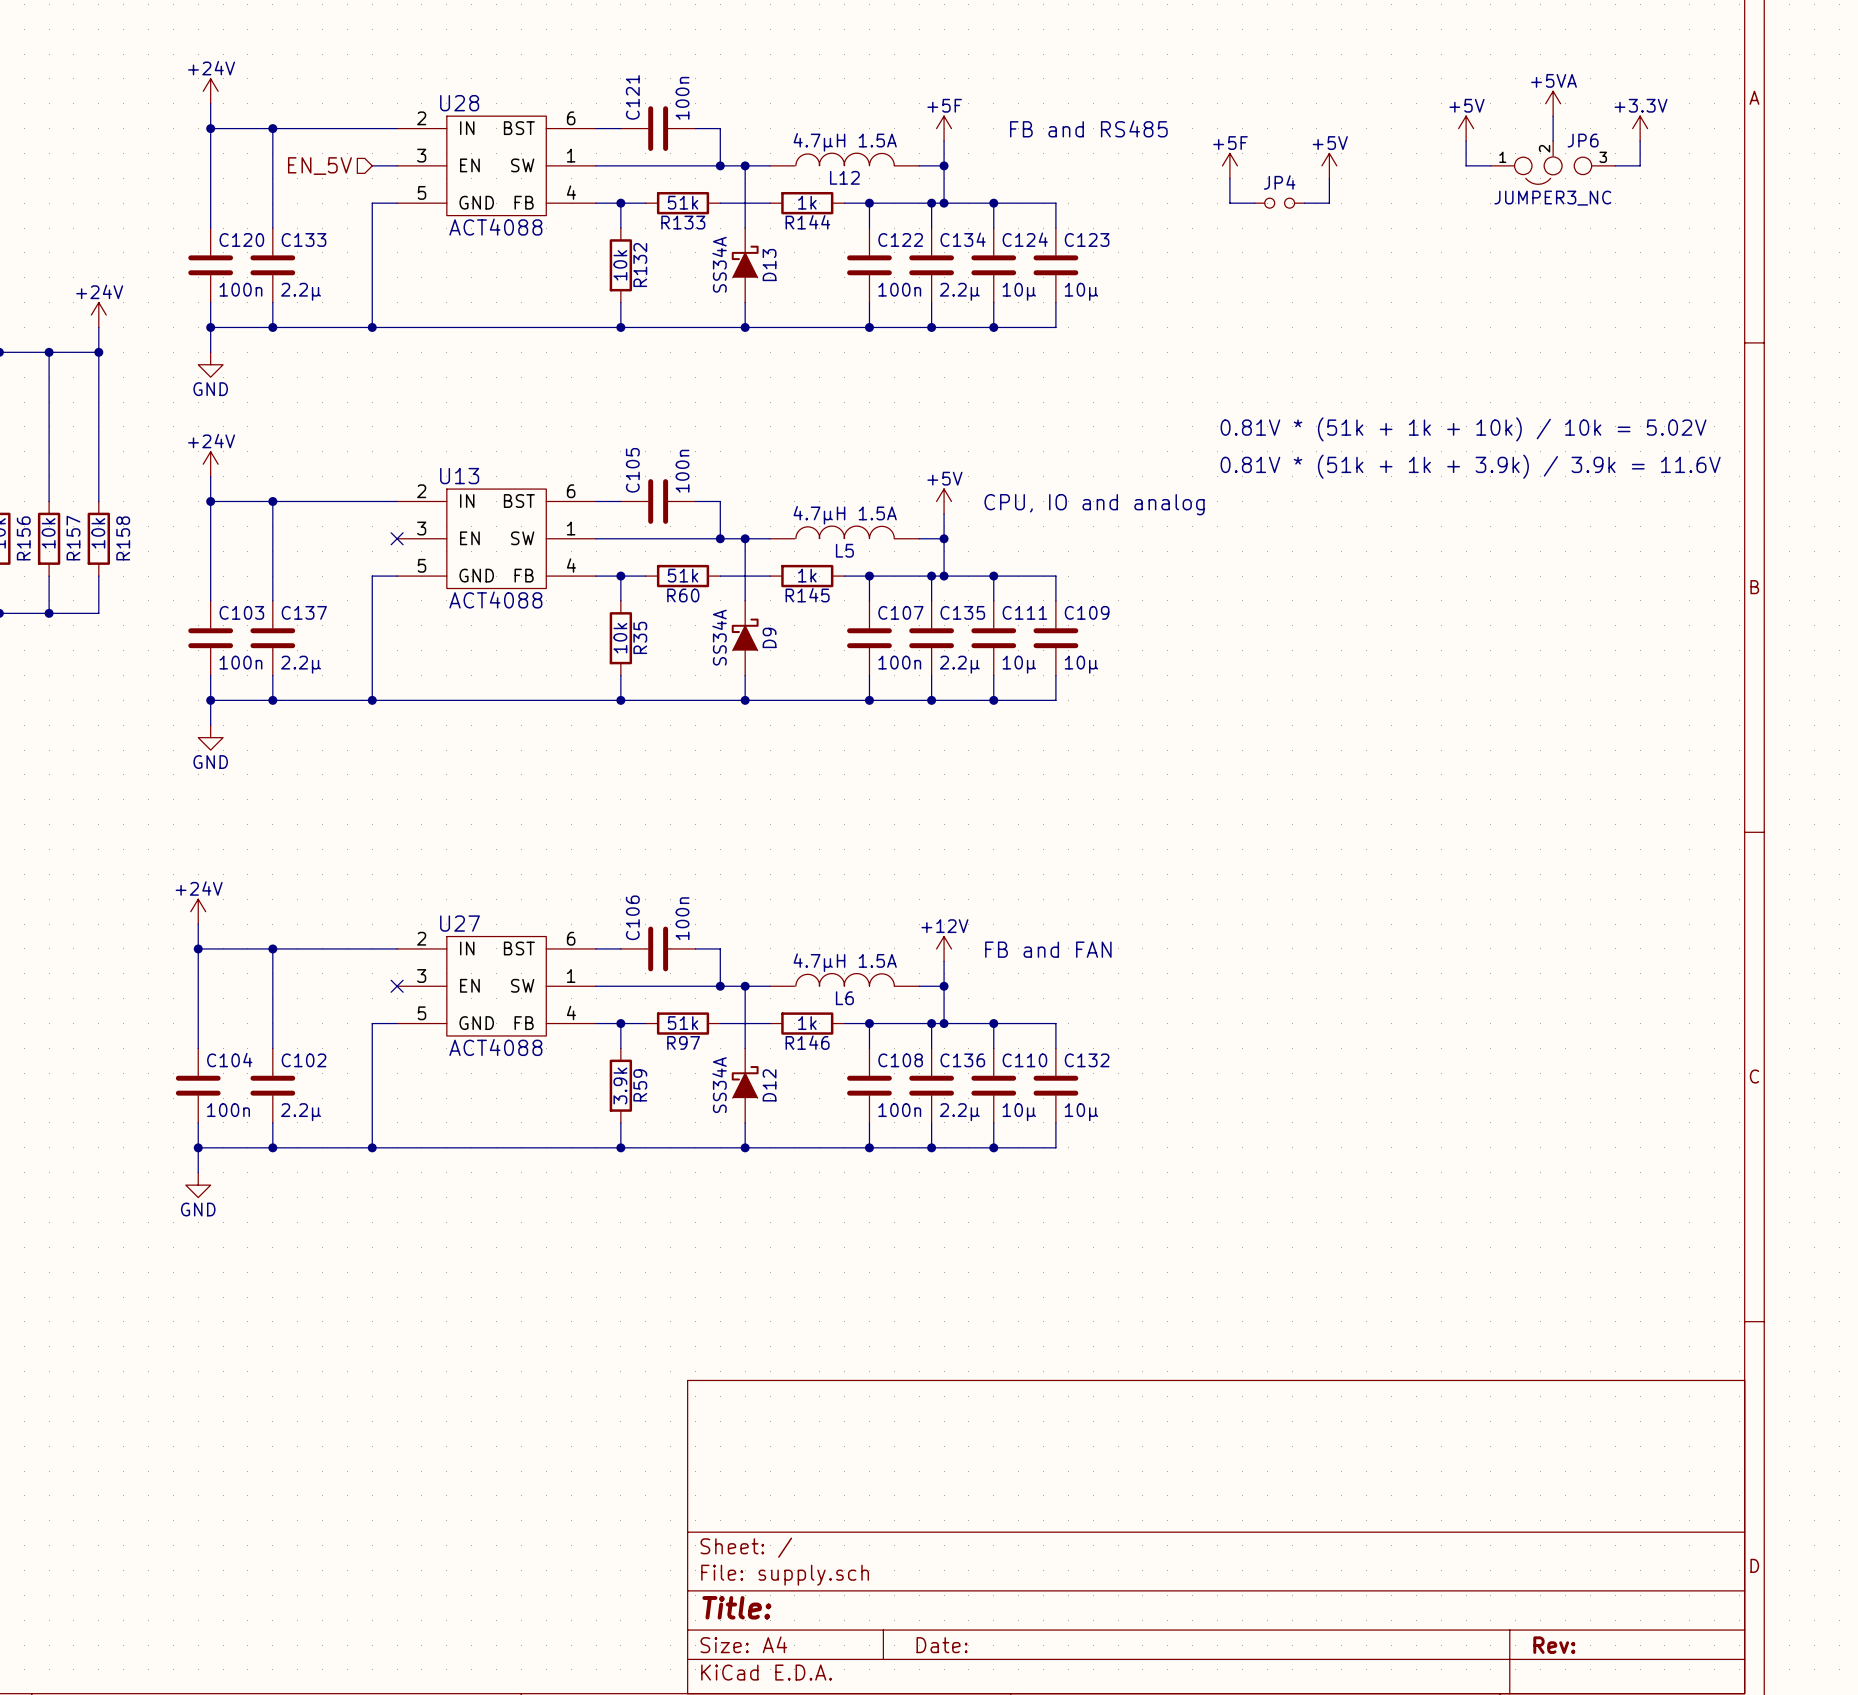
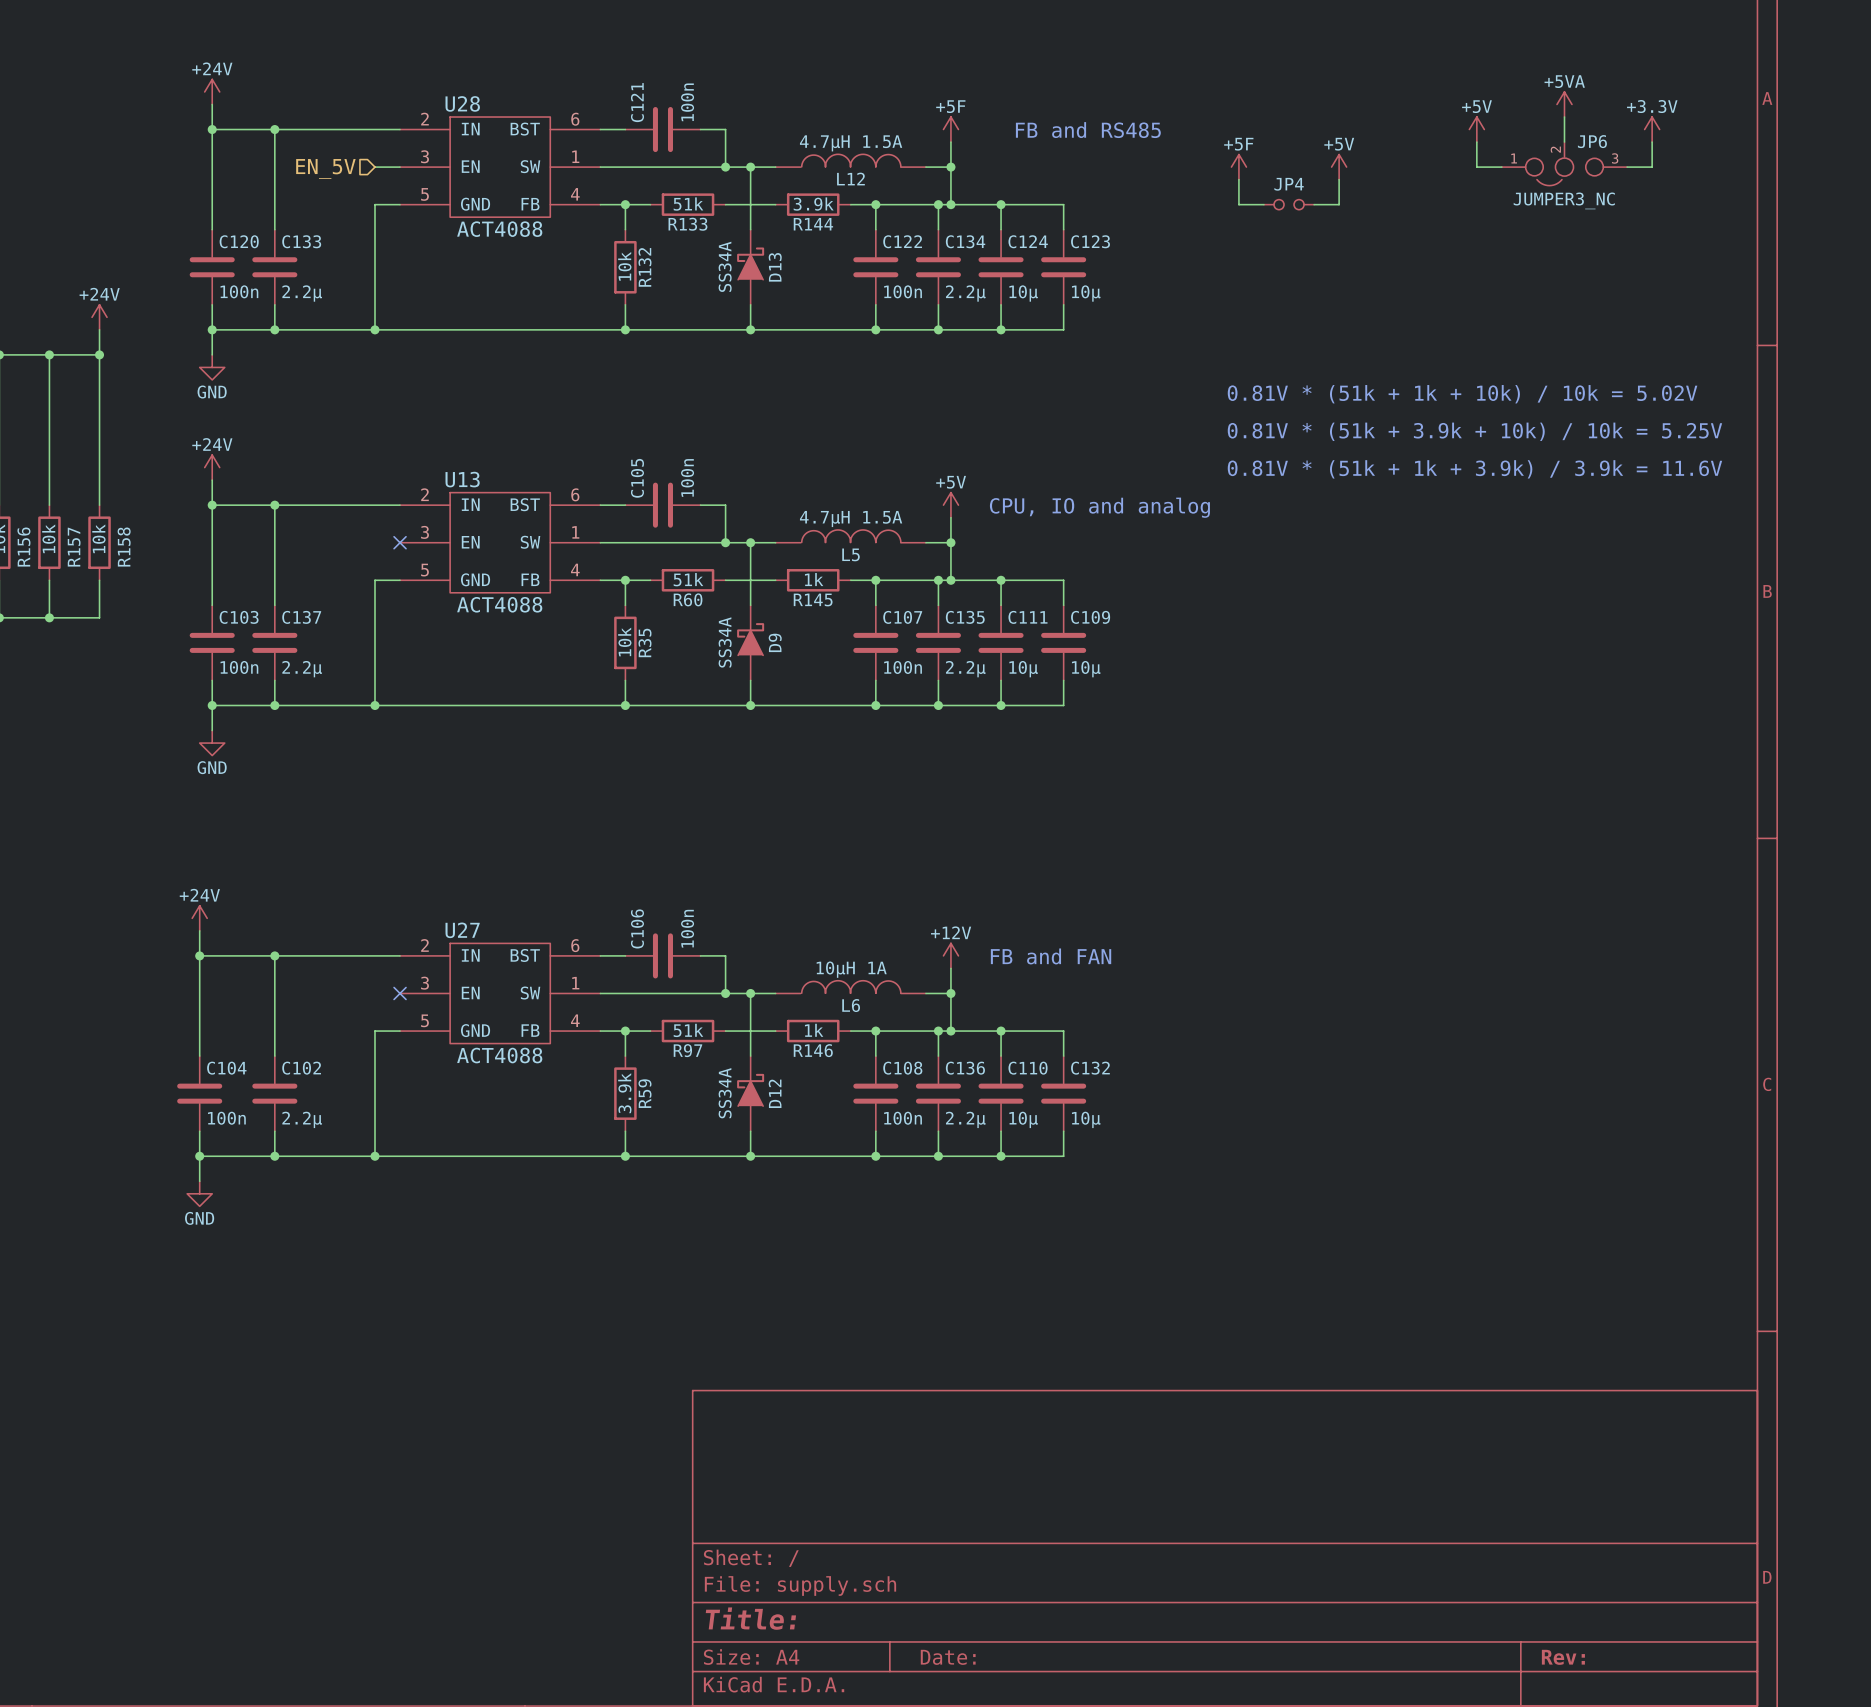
R144 value: 1k (807, 202) -> 3.9k (813, 204)
text: none -> 0.81V * (51k + 1k + 10k) / 10k = 5.02V (1462, 394)
text: 0.81V * (51k + 1k + 10k) / 10k = 5.02V (1463, 429) -> 0.81V * (51k + 3.9k + 10k) / 10k = 5.25V (1474, 431)
L6 value: 4.7µH 1.5A (845, 962) -> 10µH 1A (851, 969)

